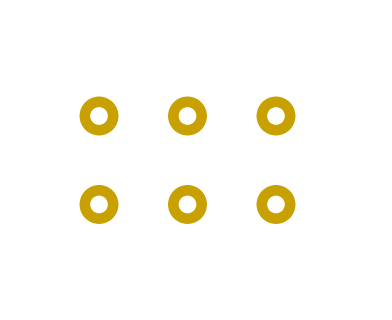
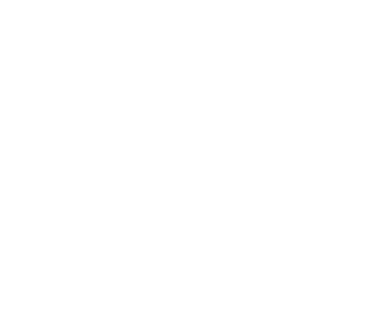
part: (187, 160) -> none

